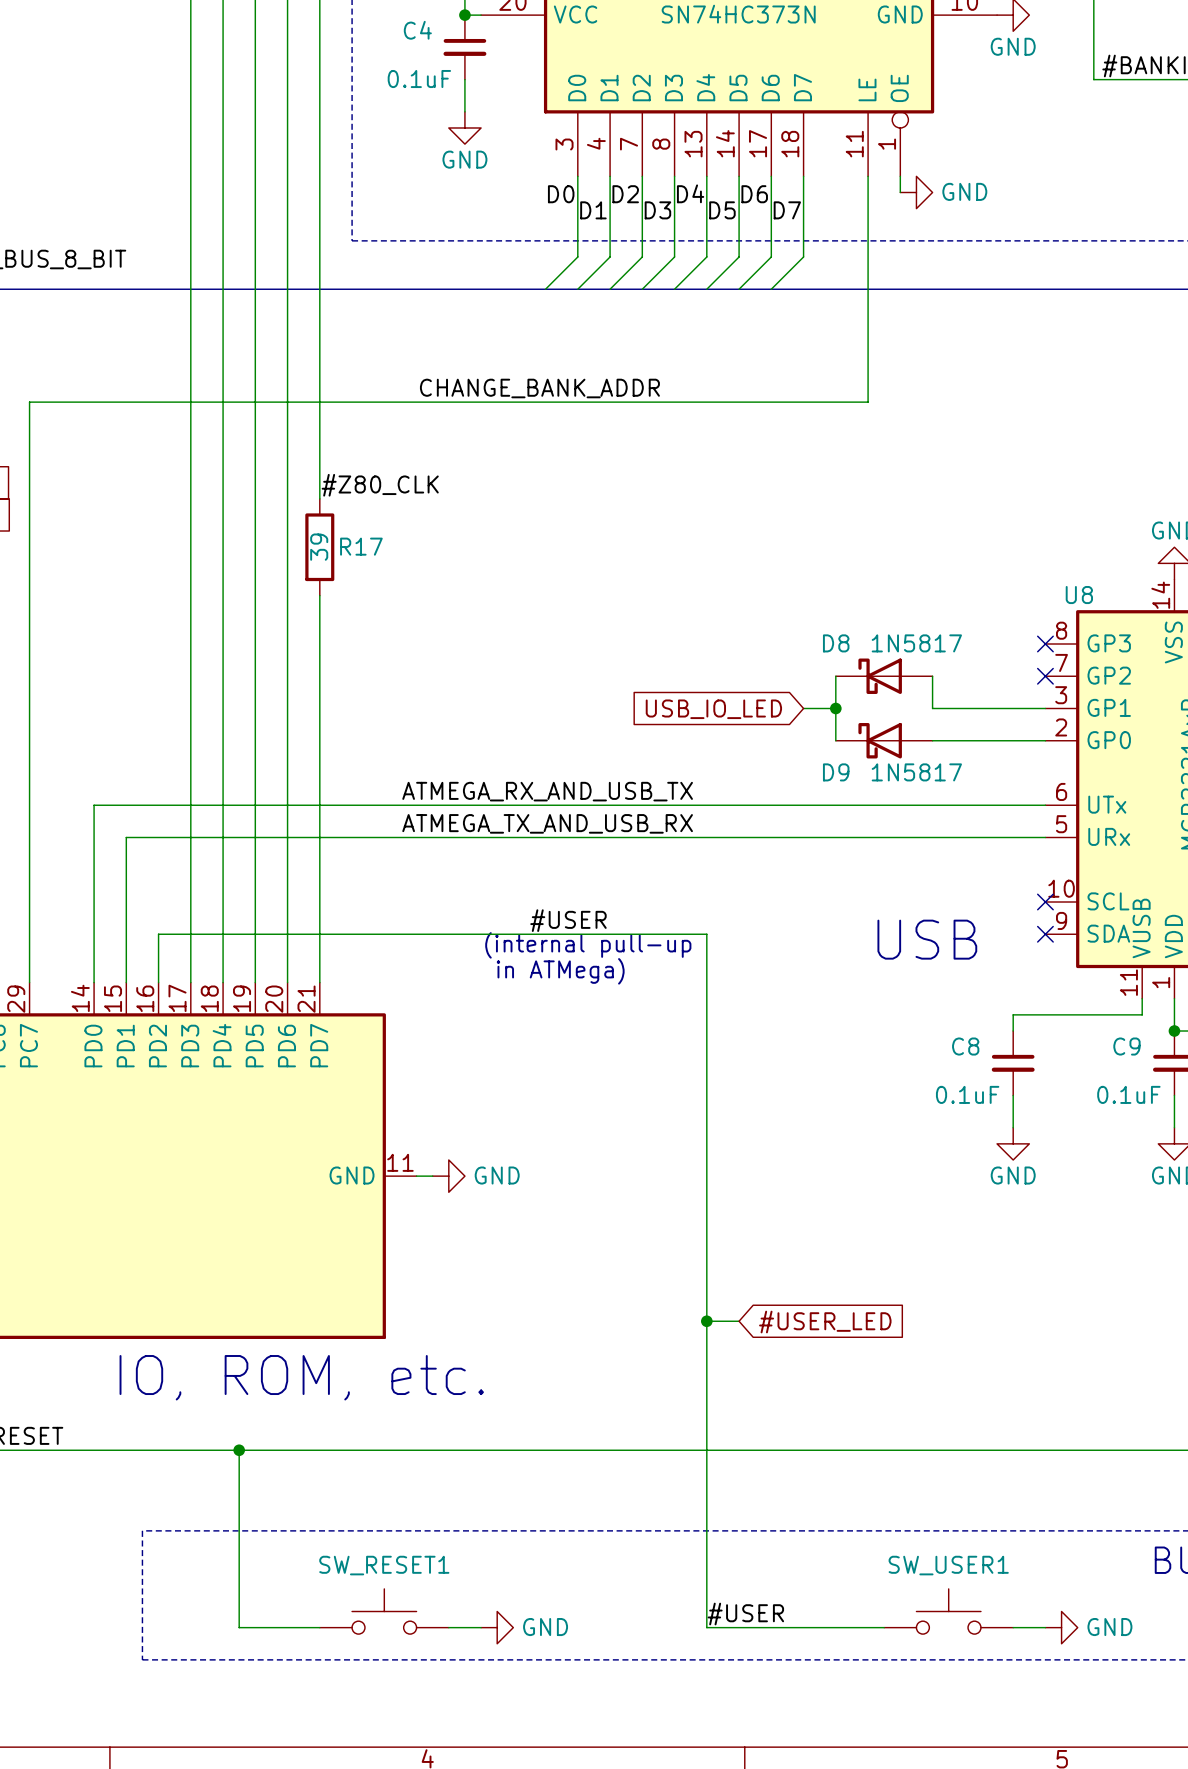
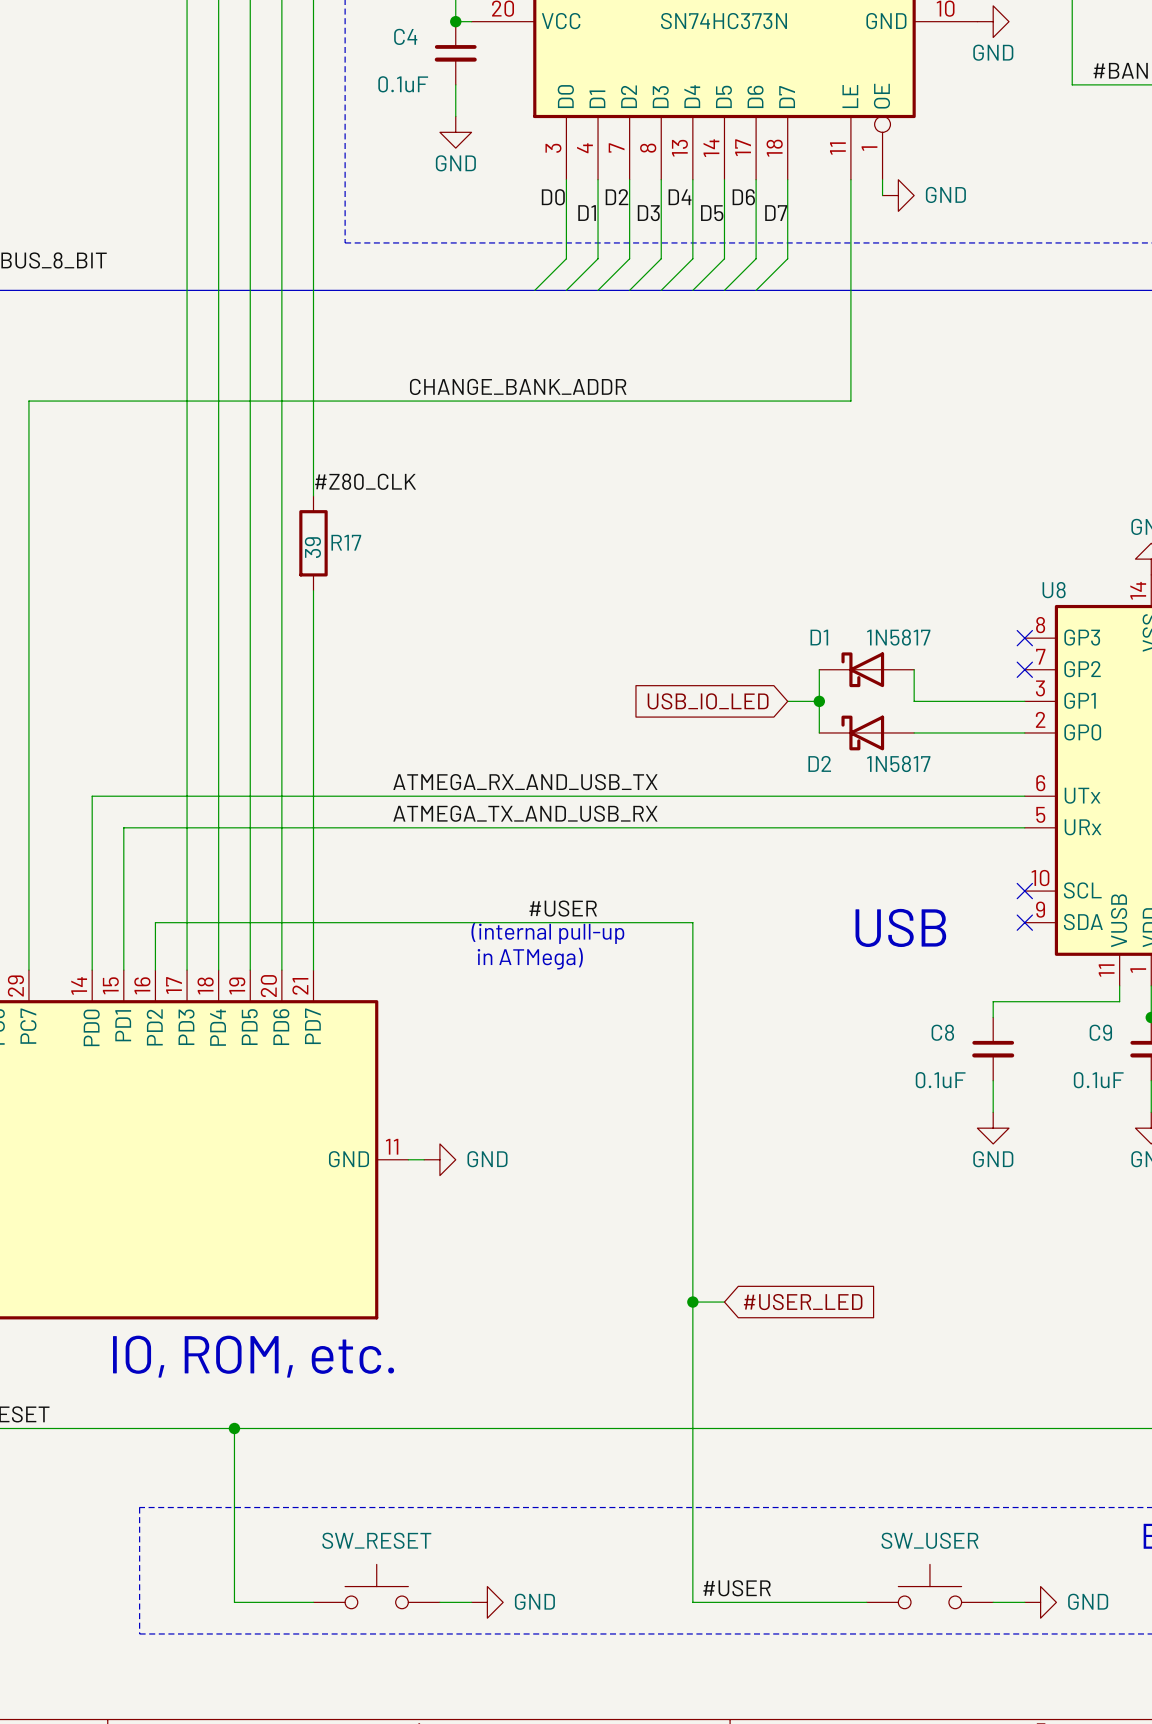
D8 name: D8 (836, 643) -> D1 (819, 637)
D9 name: D9 (836, 772) -> D2 (819, 763)
SW_RESET1 name: SW_RESET1 (384, 1565) -> SW_RESET (376, 1540)
SW_USER1 name: SW_USER1 (948, 1565) -> SW_USER (930, 1540)

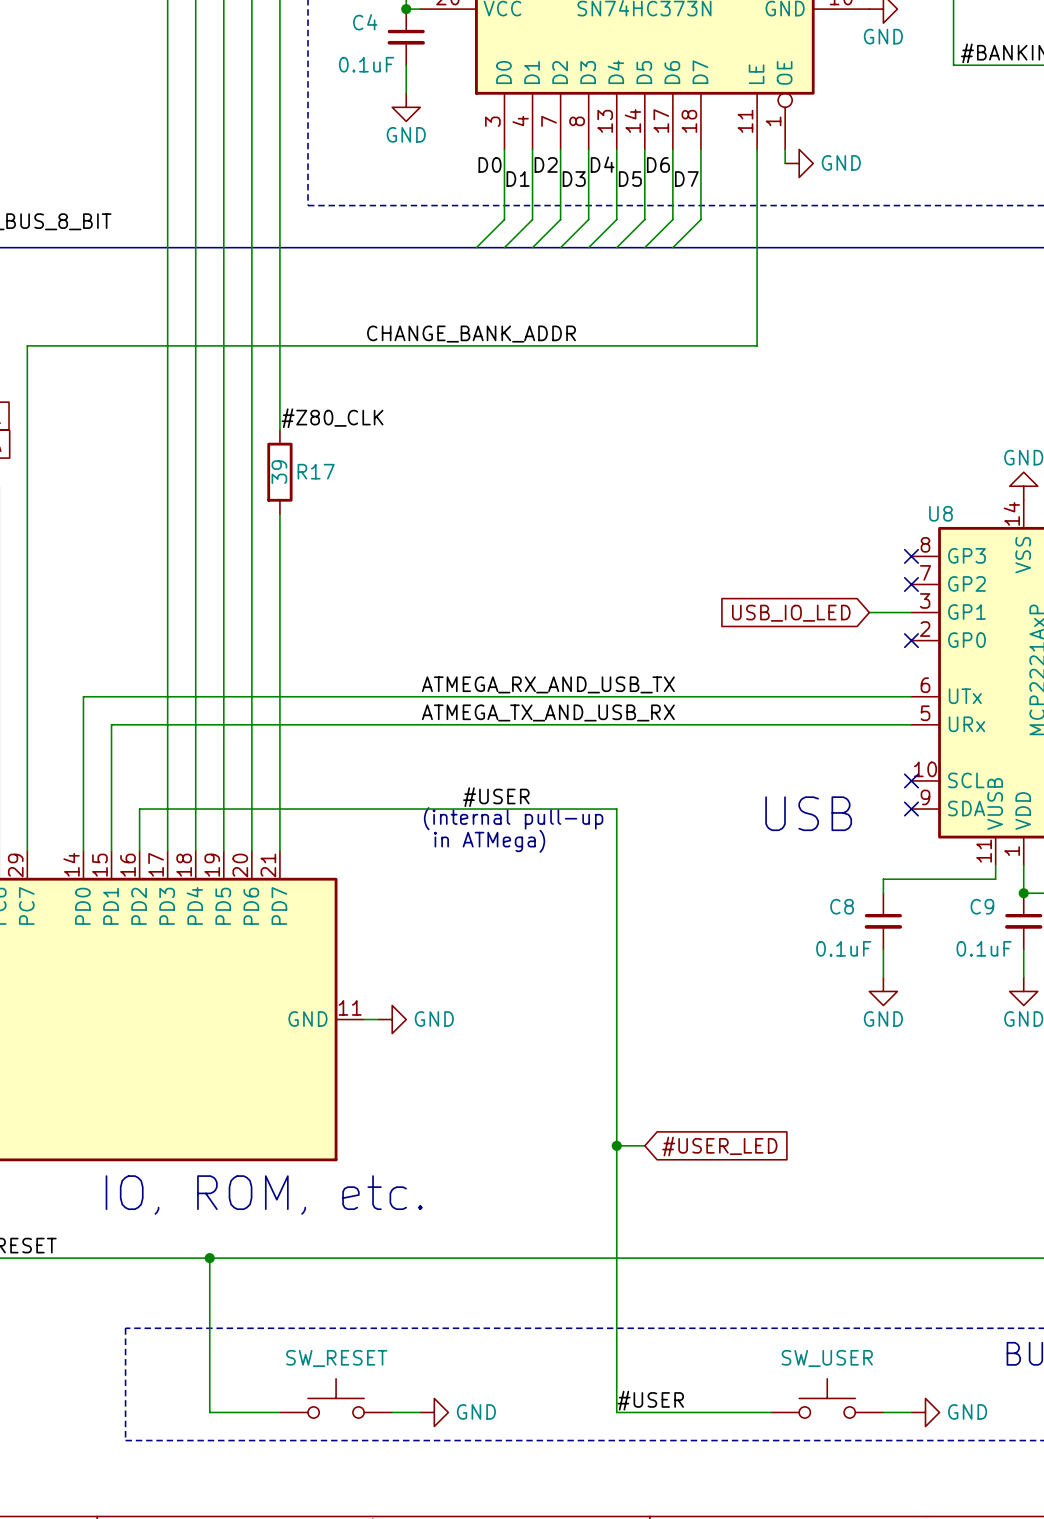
wire: (819, 669) (819, 732) -> none
D1: 1N5817 (866, 669) -> none
wire: (914, 669) (914, 701) (977, 701) -> none
global label position: USB_IO_LED (708, 701) -> USB_IO_LED (791, 613)
wire: (787, 701) (819, 701) -> none
junction: (819, 701) -> none
D2: 1N5817 (866, 732) -> none
wire: (914, 732) (1024, 732) -> none
no-connect mark: none -> (911, 640)
label position: ATMEGA_RX_AND_USB_TX (525, 782) -> ATMEGA_RX_AND_USB_TX (548, 684)
label position: ATMEGA_TX_AND_USB_RX (525, 813) -> ATMEGA_TX_AND_USB_RX (548, 712)

